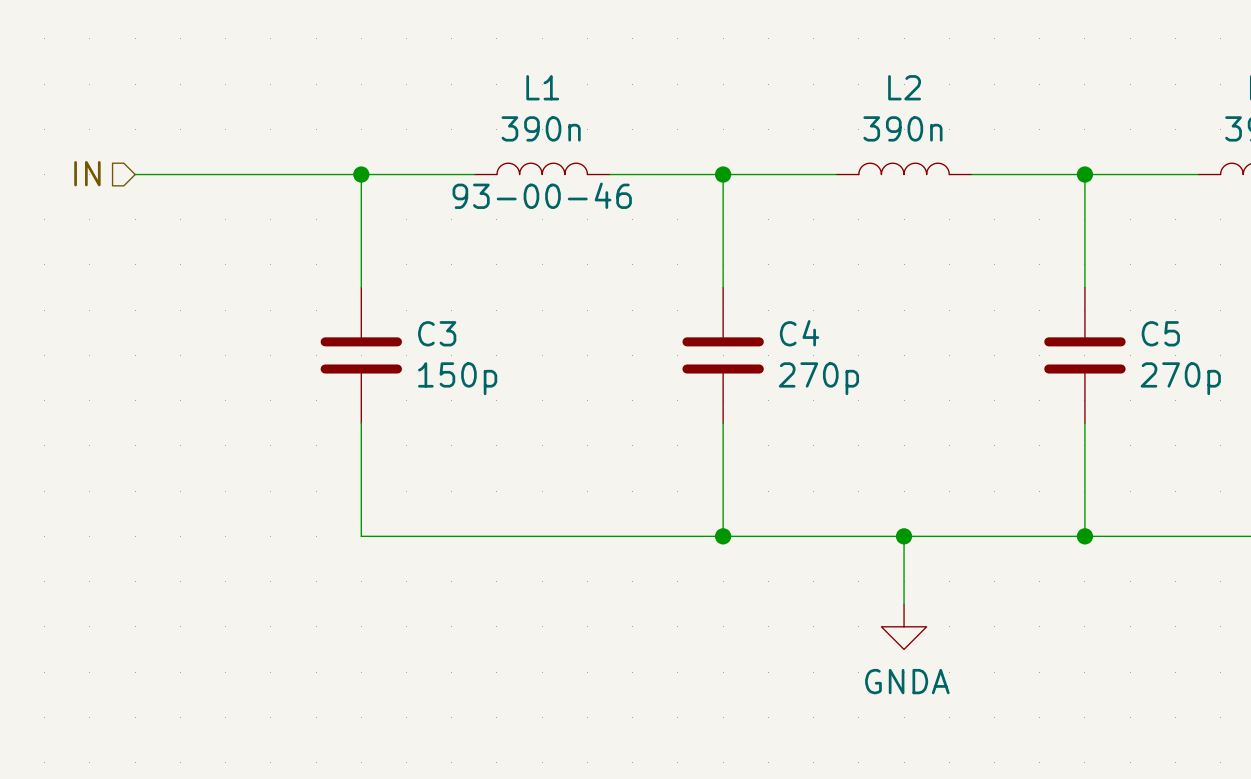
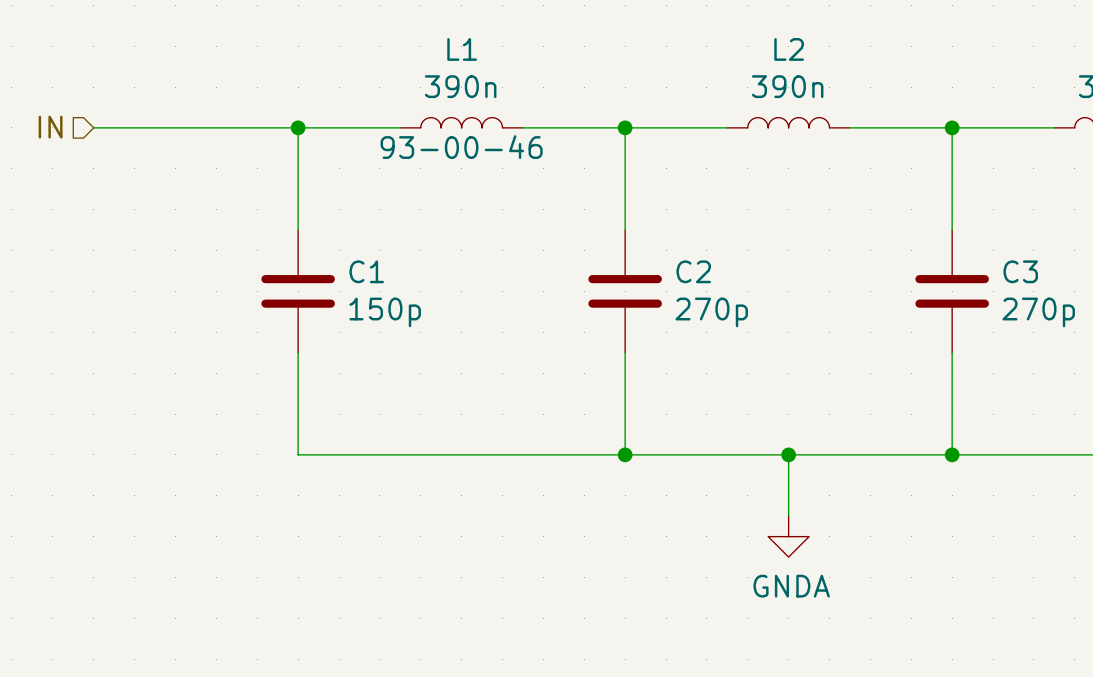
C3 name: C3 (437, 333) -> C1 (366, 271)
C4 name: C4 (799, 333) -> C2 (693, 271)
C5 name: C5 (1160, 333) -> C3 (1020, 271)

